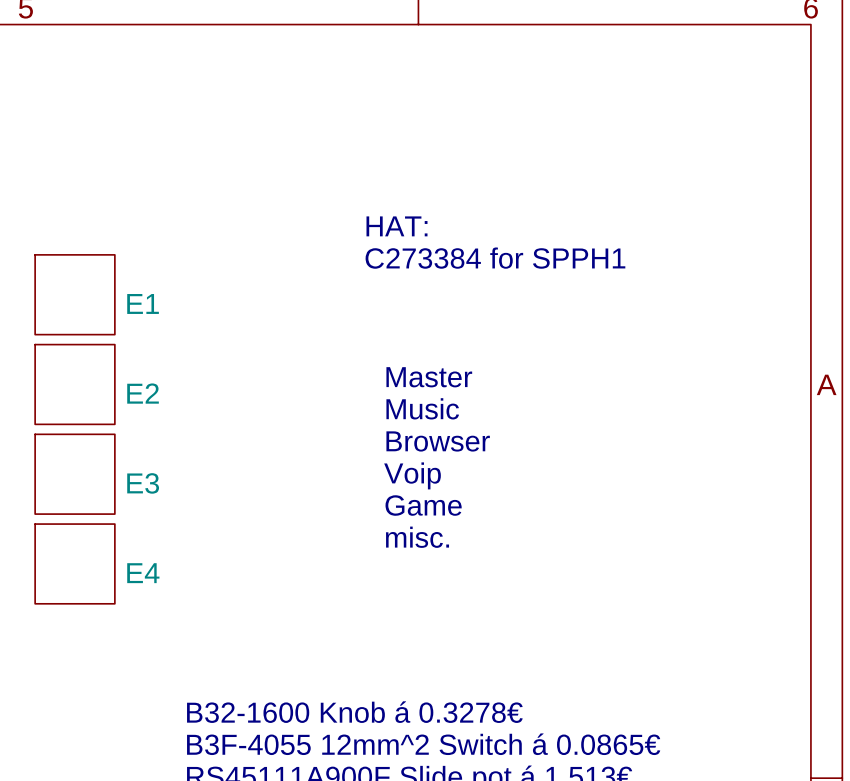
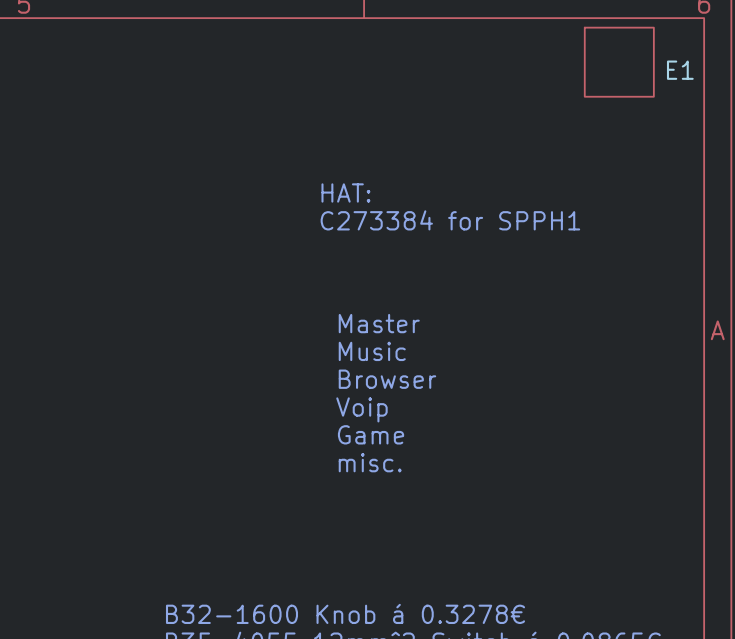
E1 position: (75, 294) -> (619, 62)
E2: (75, 384) -> none
E3: (75, 474) -> none
E4: (75, 563) -> none

